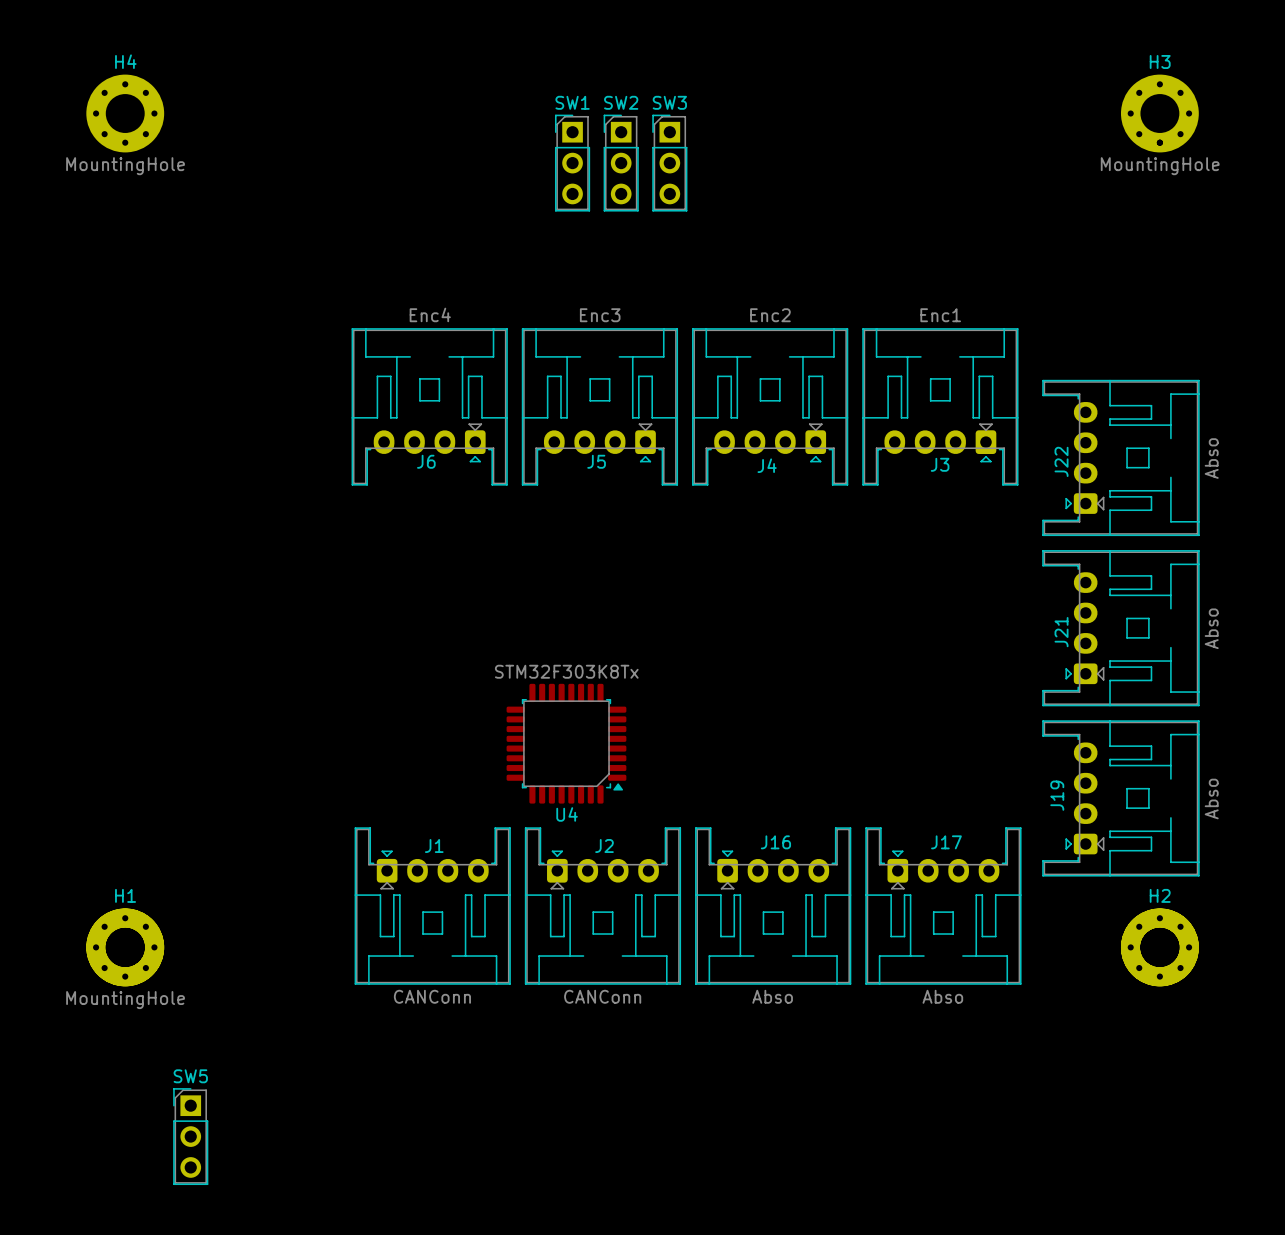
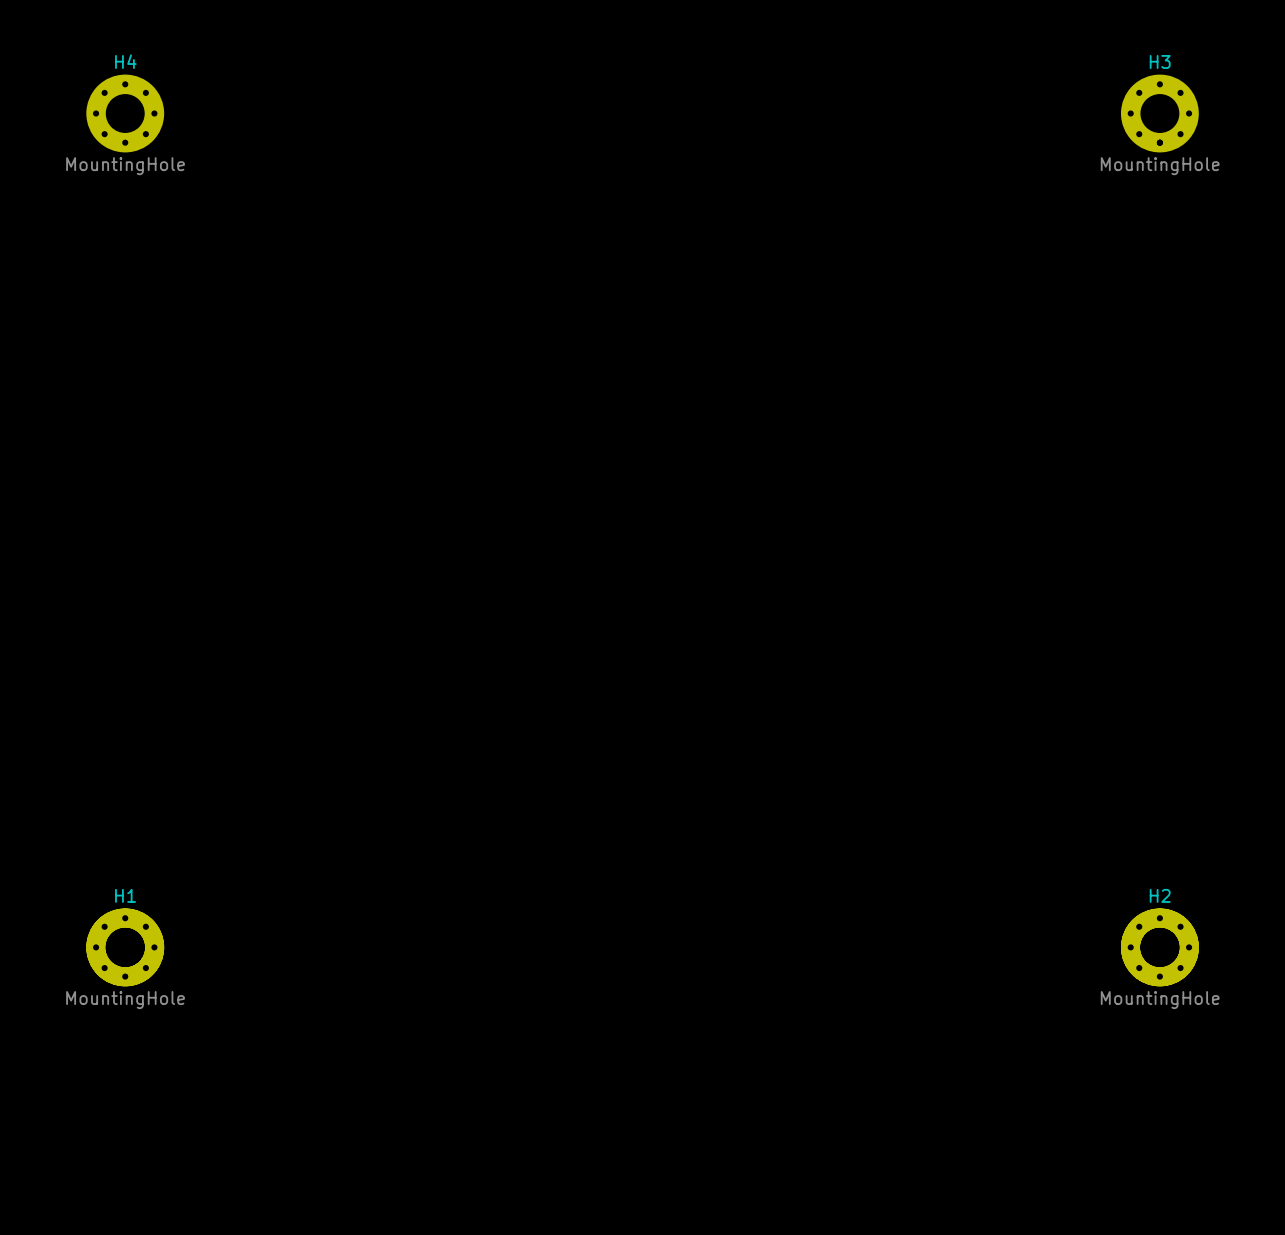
SW1: (572, 163) -> none
SW2: (621, 163) -> none
SW3: (669, 163) -> none
J6: Enc4 (429, 406) -> none
J5: Enc3 (599, 406) -> none
J4: Enc2 (770, 406) -> none
J3: Enc1 (940, 406) -> none
J22: Abso (1120, 457) -> none
J21: Abso (1120, 628) -> none
U4: STM32F303K8Tx (566, 743) -> none
J19: Abso (1120, 798) -> none
J1: CANConn (432, 906) -> none
J2: CANConn (602, 906) -> none
J16: Abso (773, 906) -> none
J17: Abso (943, 906) -> none
H2 value: none -> MountingHole (1160, 1000)
SW5: (190, 1136) -> none

